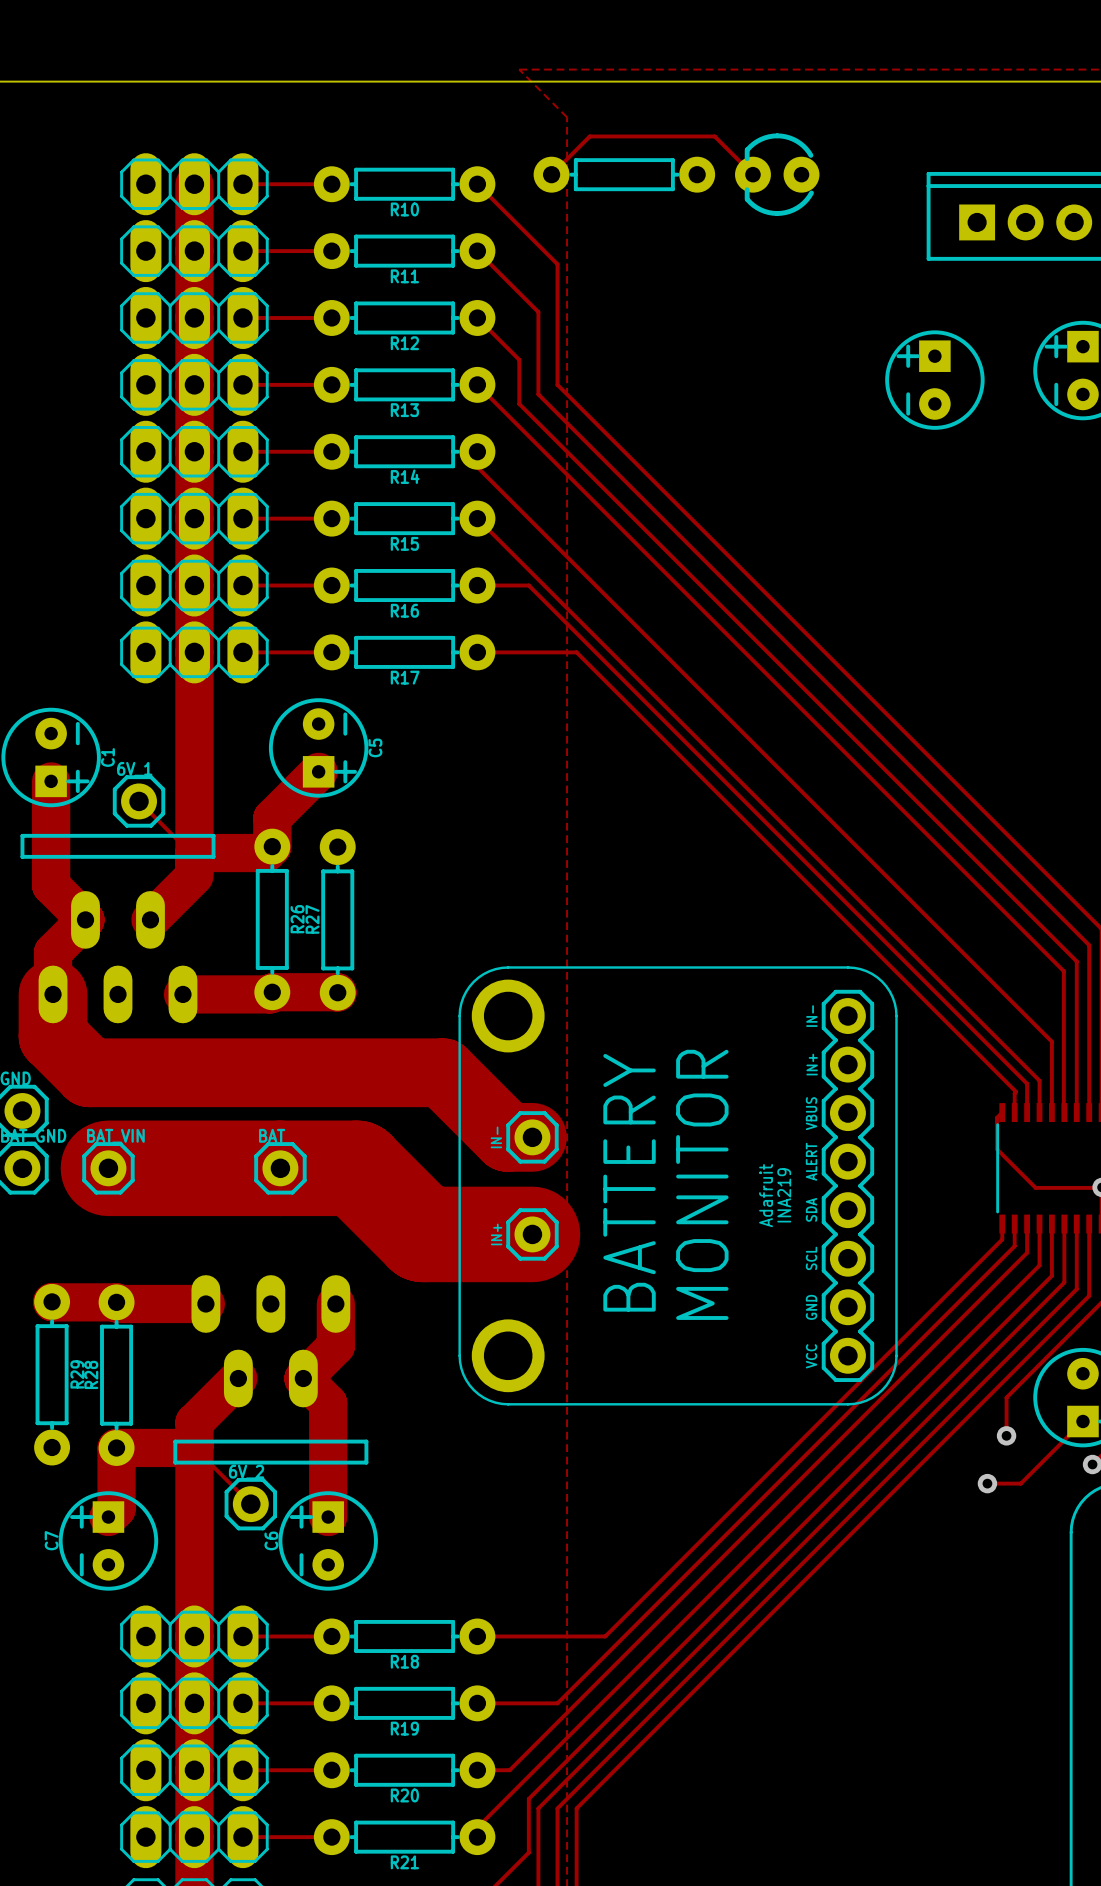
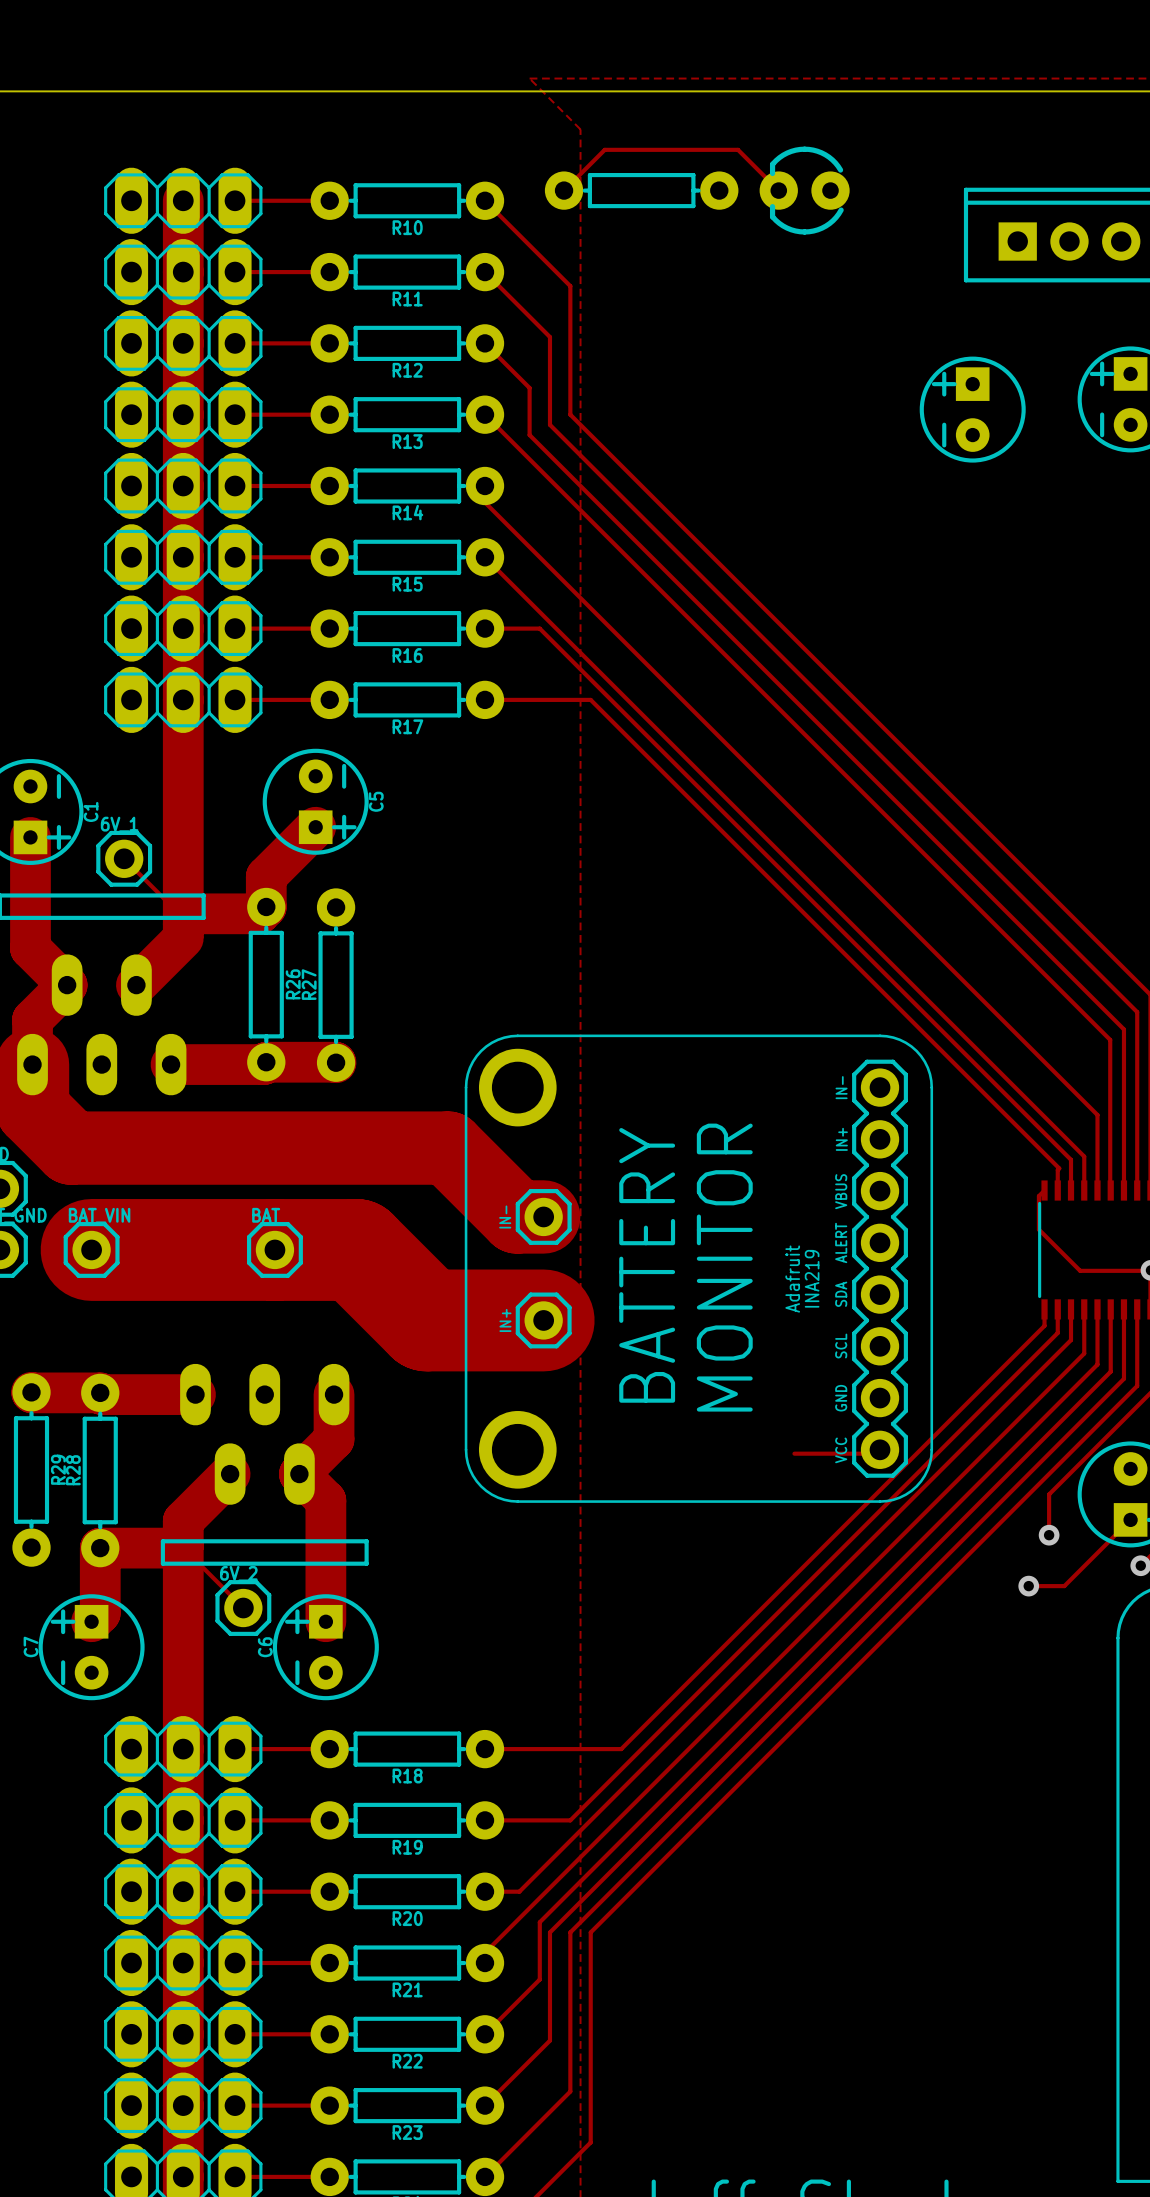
track: none -> (880, 1449) (876, 1453) (794, 1453)

